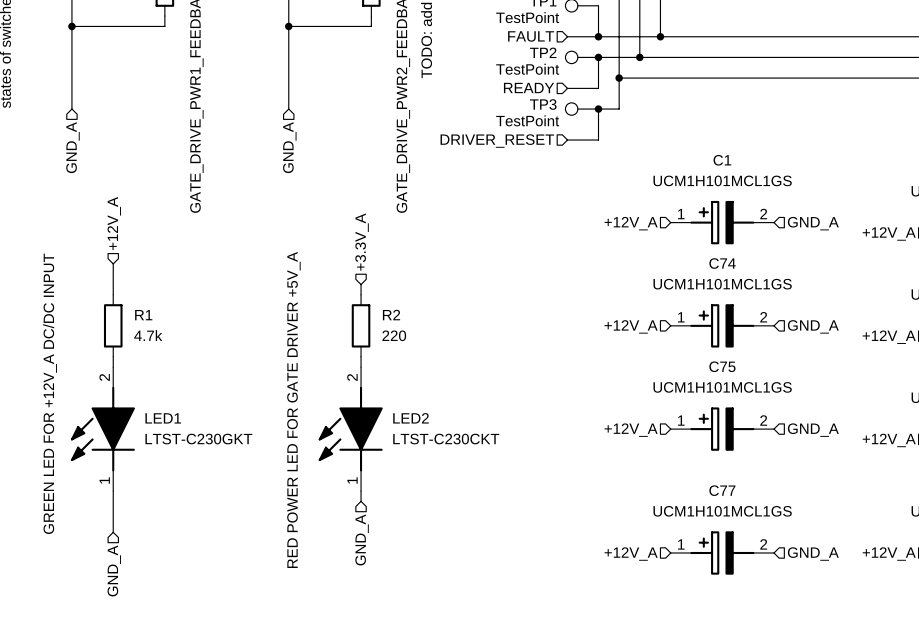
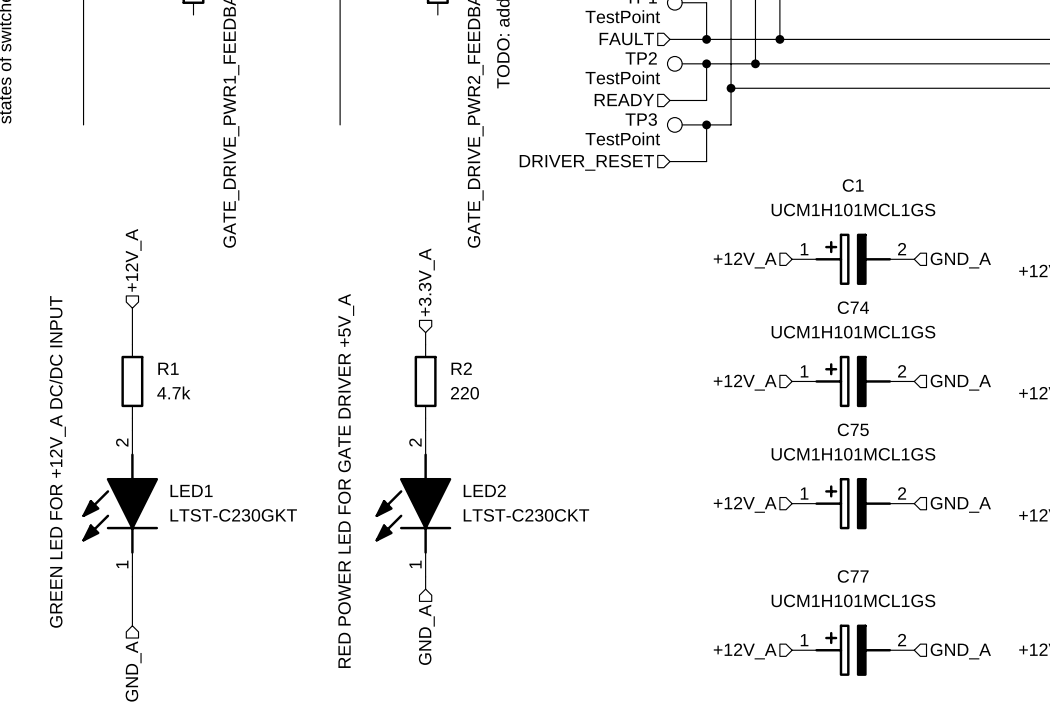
wire: (164, 16) (164, 26) (71, 26) -> none
wire: (371, 16) (371, 26) (288, 26) -> none
junction: (71, 26) -> none
junction: (288, 26) -> none
hierarchical label: GND_A (72, 147) -> none
hierarchical label: GND_A (289, 147) -> none

